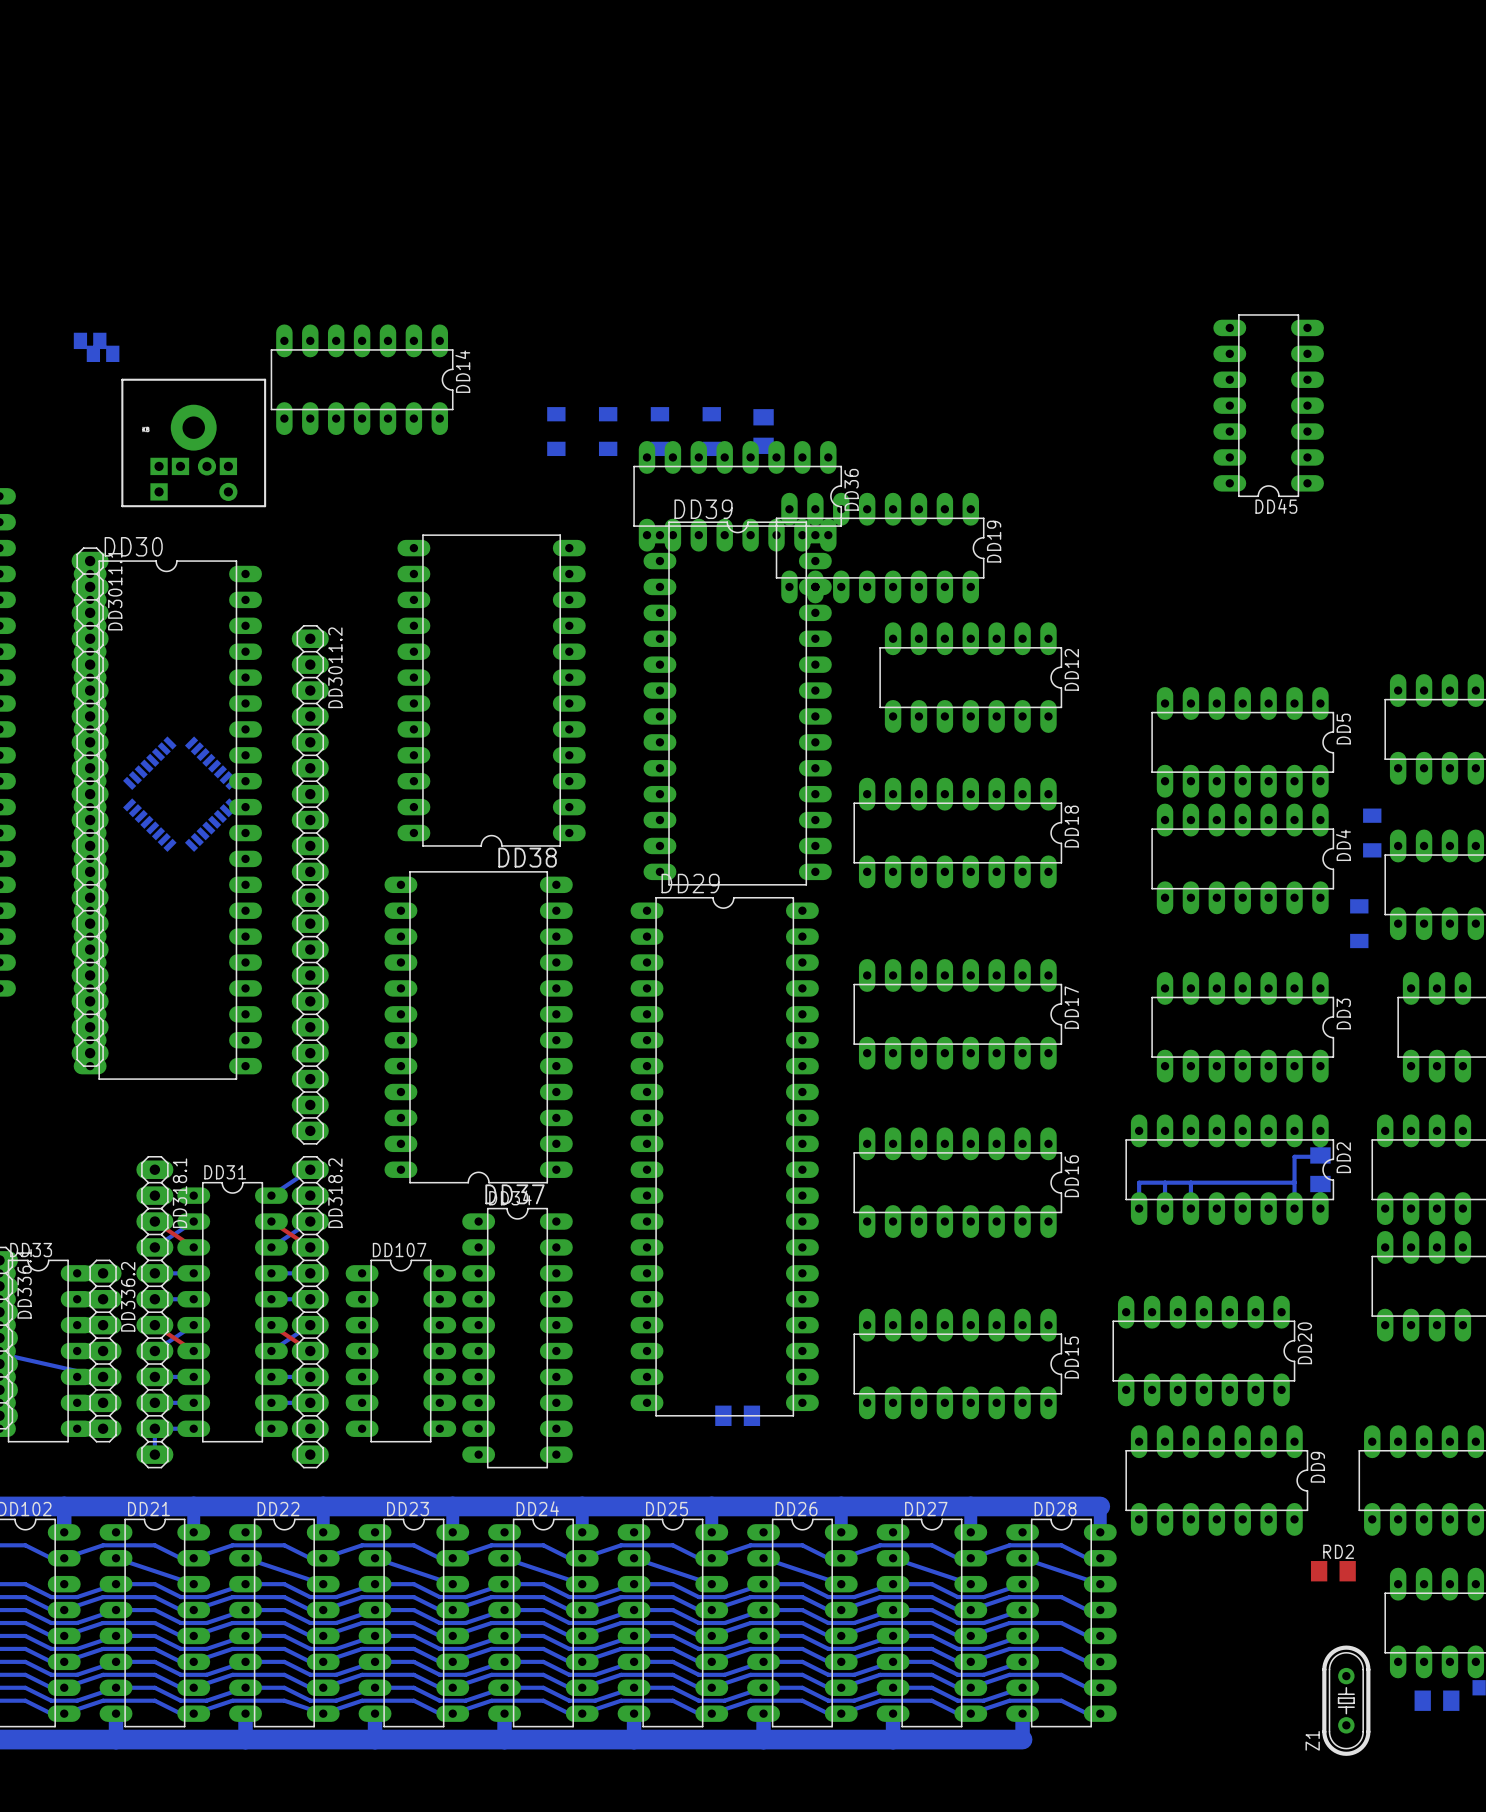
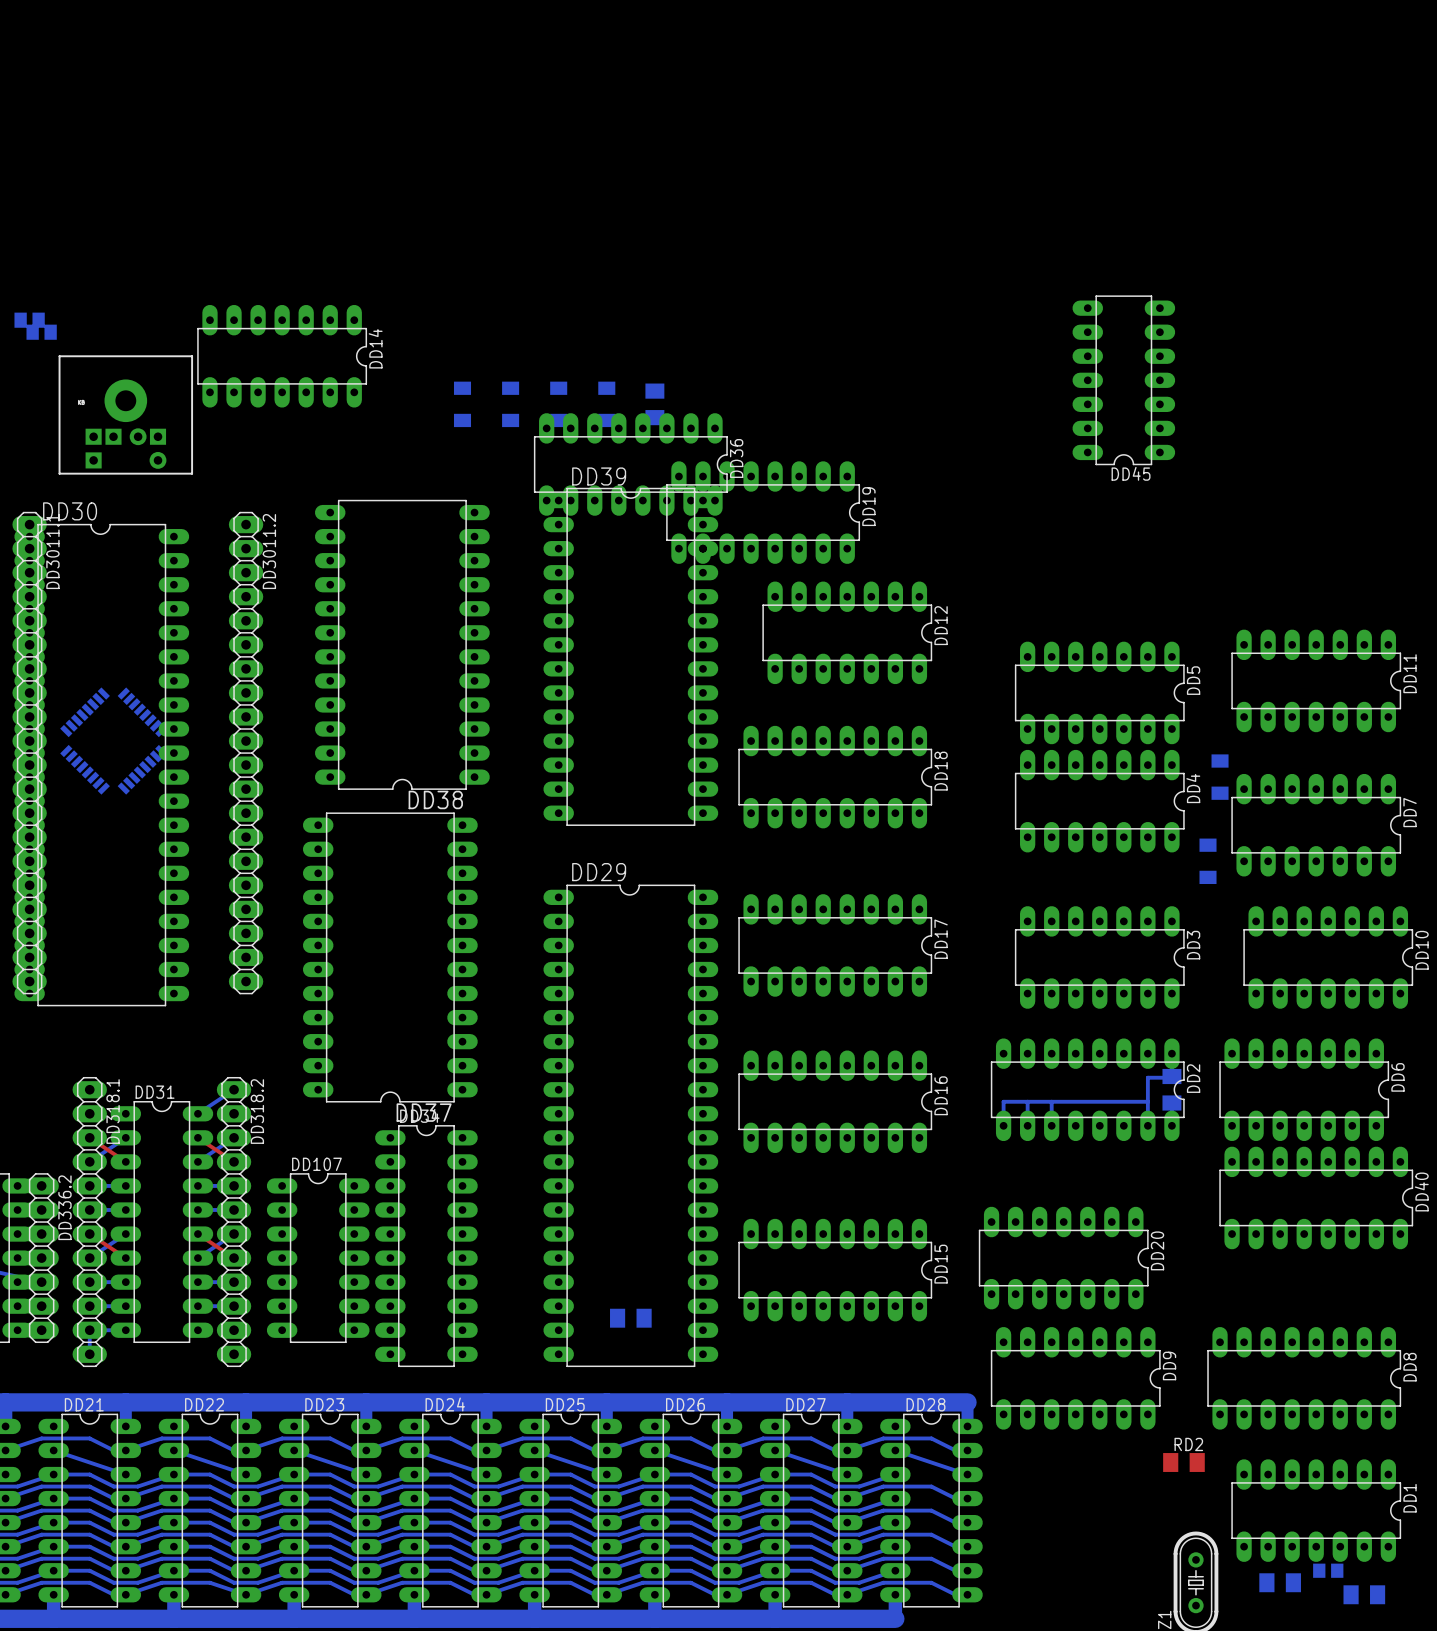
DD3011.2 position: (310, 884) -> (246, 753)
DD29 position: (724, 1156) -> (630, 1125)

